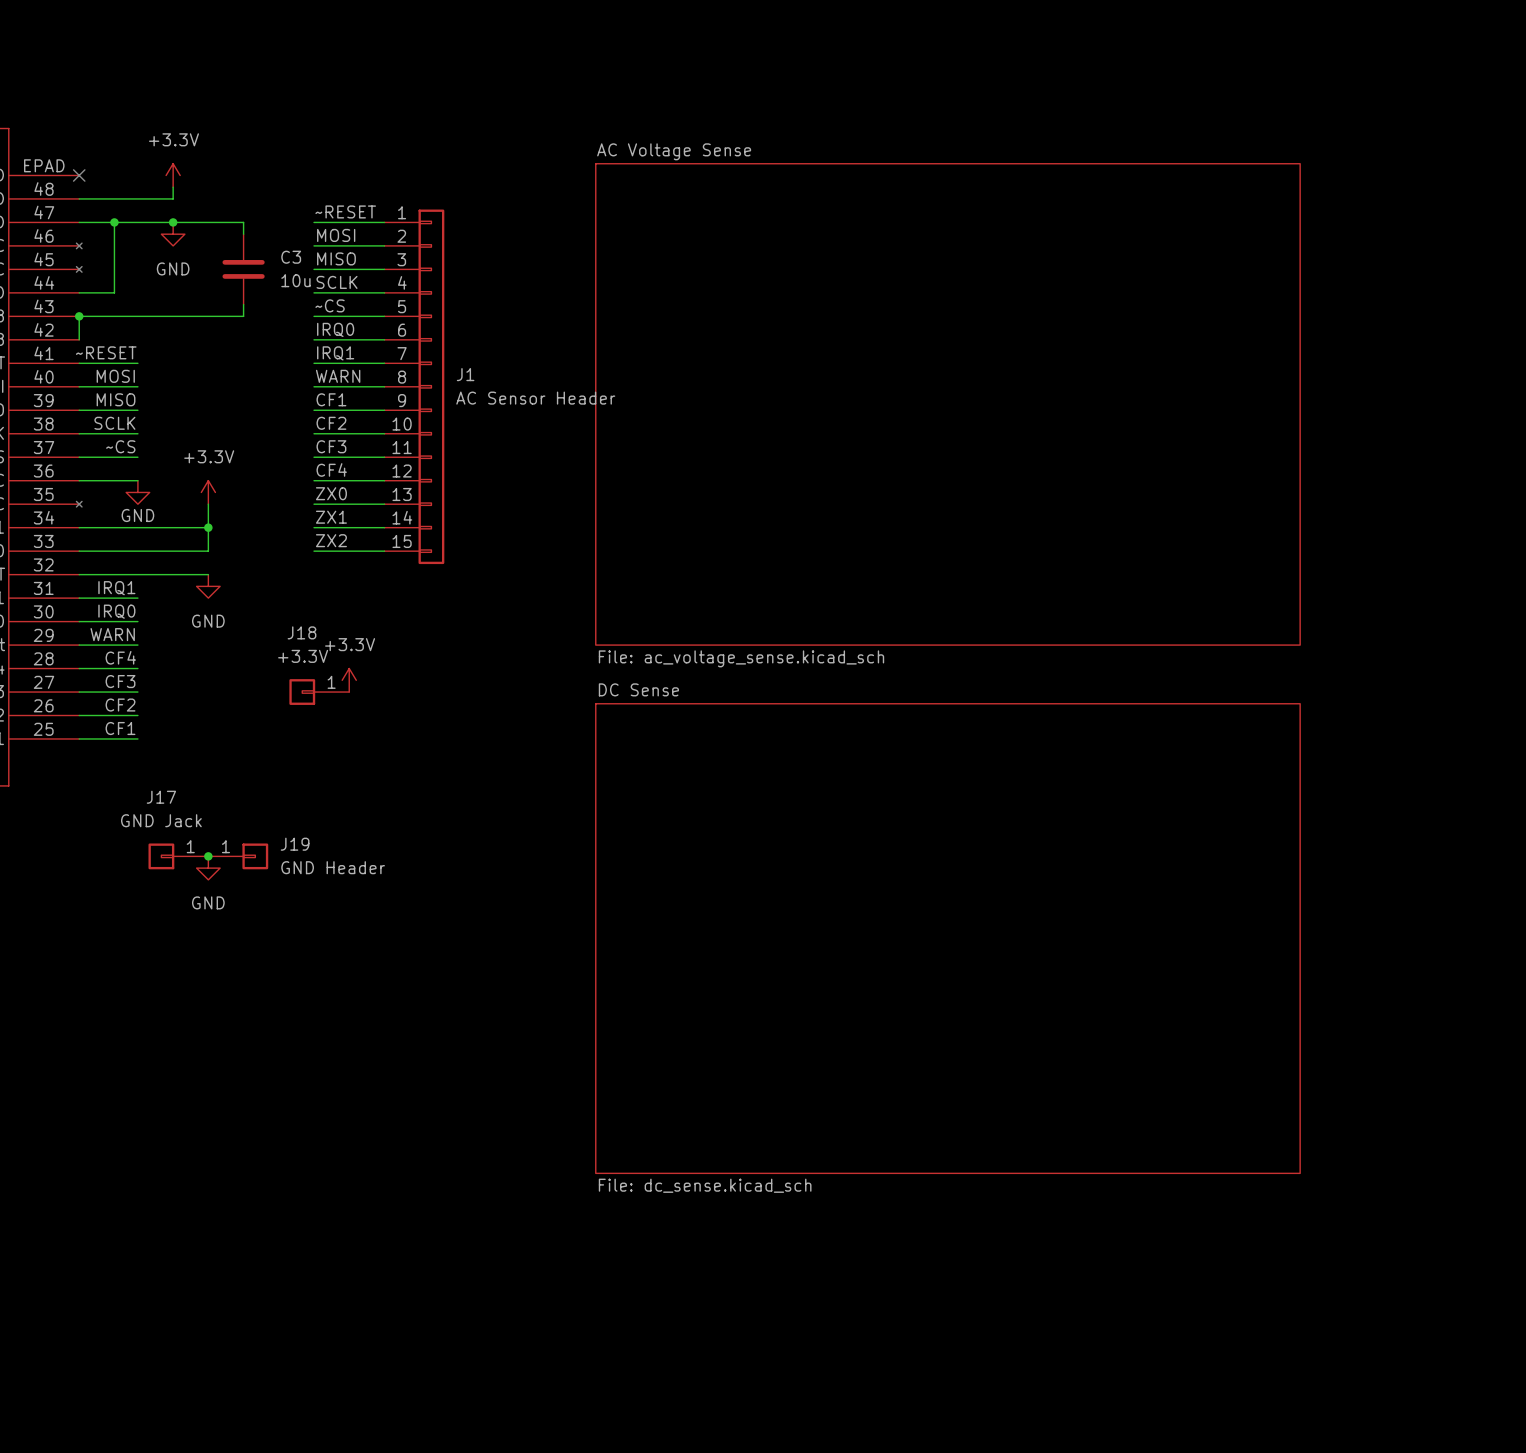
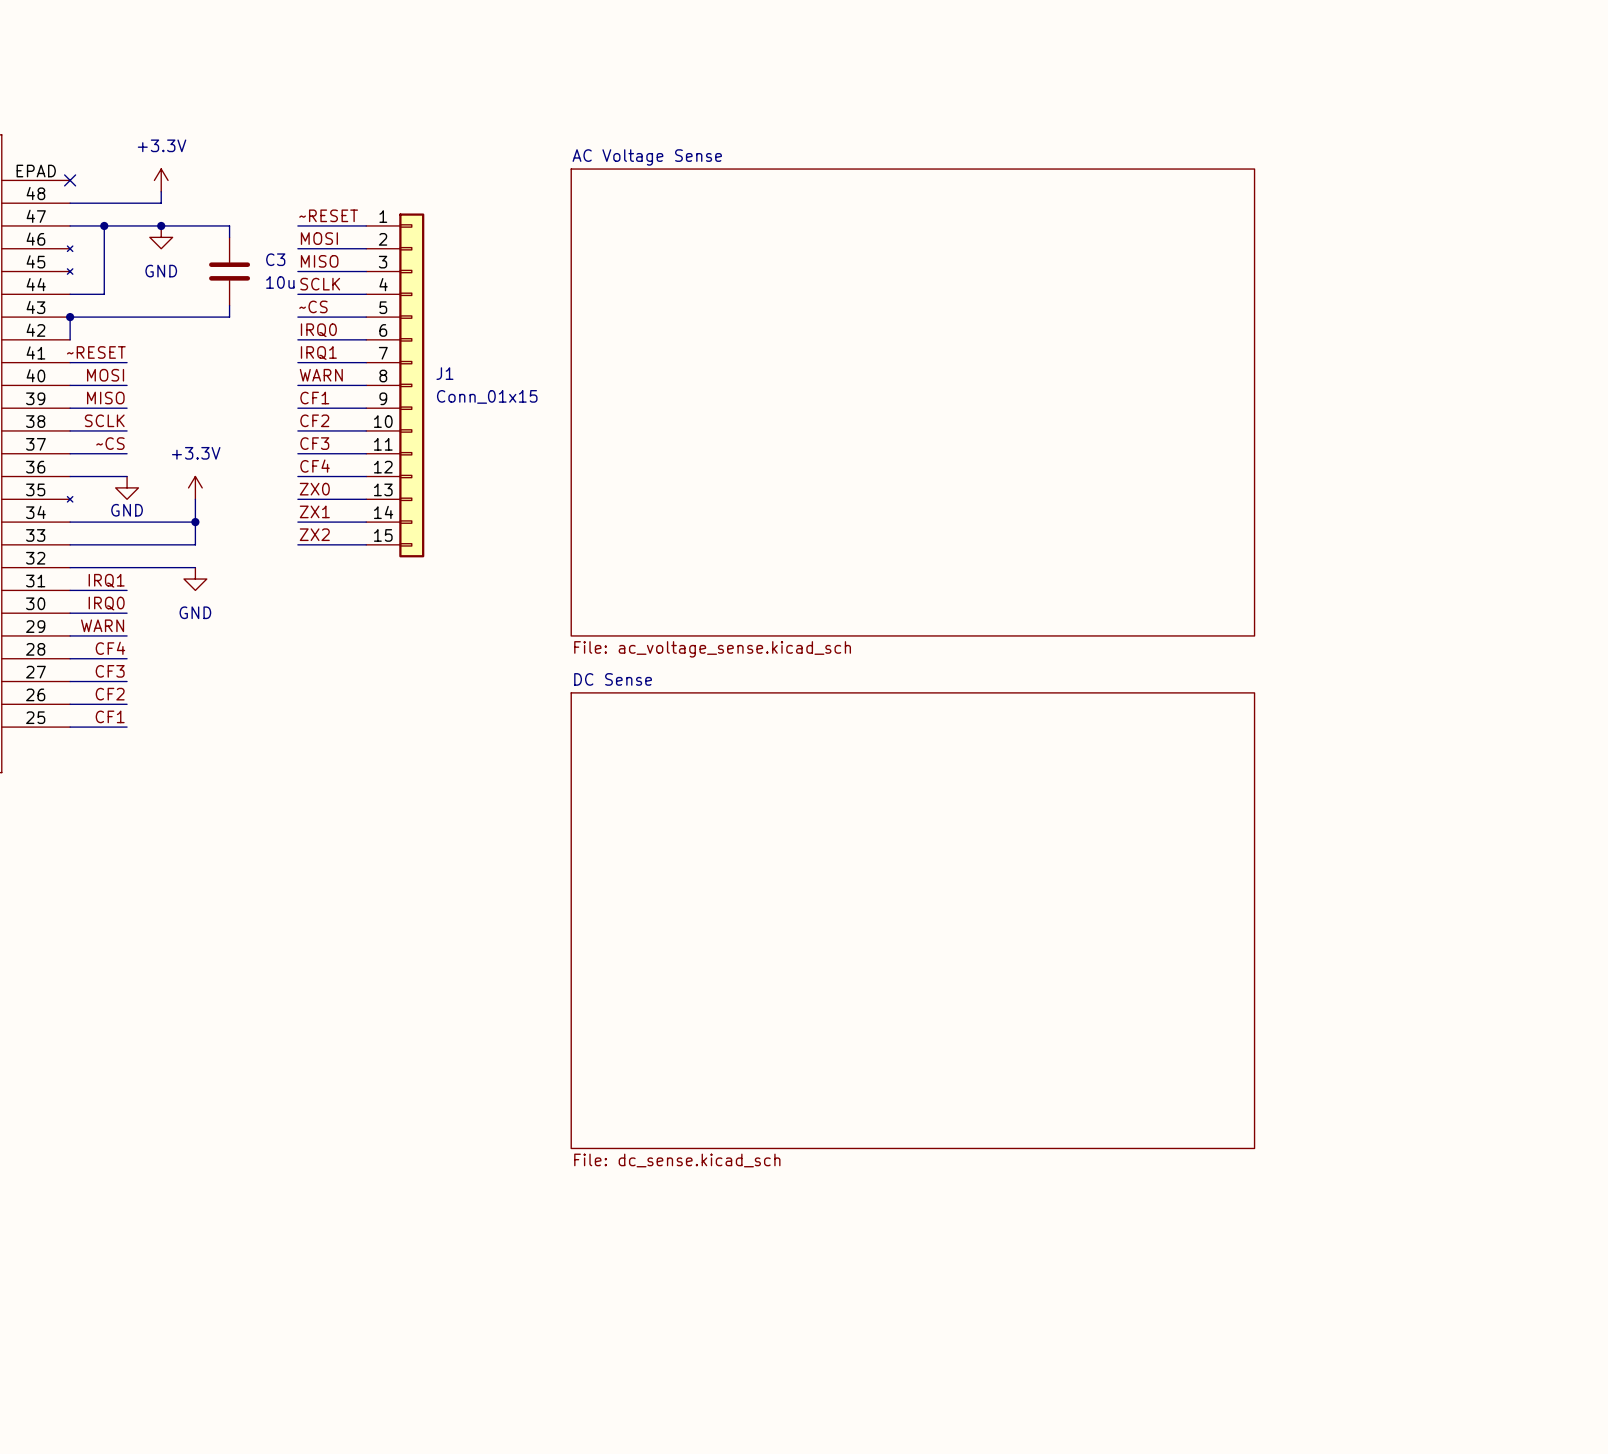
J1 value: AC Sensor Header (535, 398) -> Conn_01x15 (487, 396)
power symbol: +3.3V (349, 680) -> none
J18: +3.3V (319, 692) -> none
J17: GND Jack (178, 856) -> none
junction: (208, 856) -> none
J19: GND Header (238, 856) -> none
power symbol: GND (208, 868) -> none

